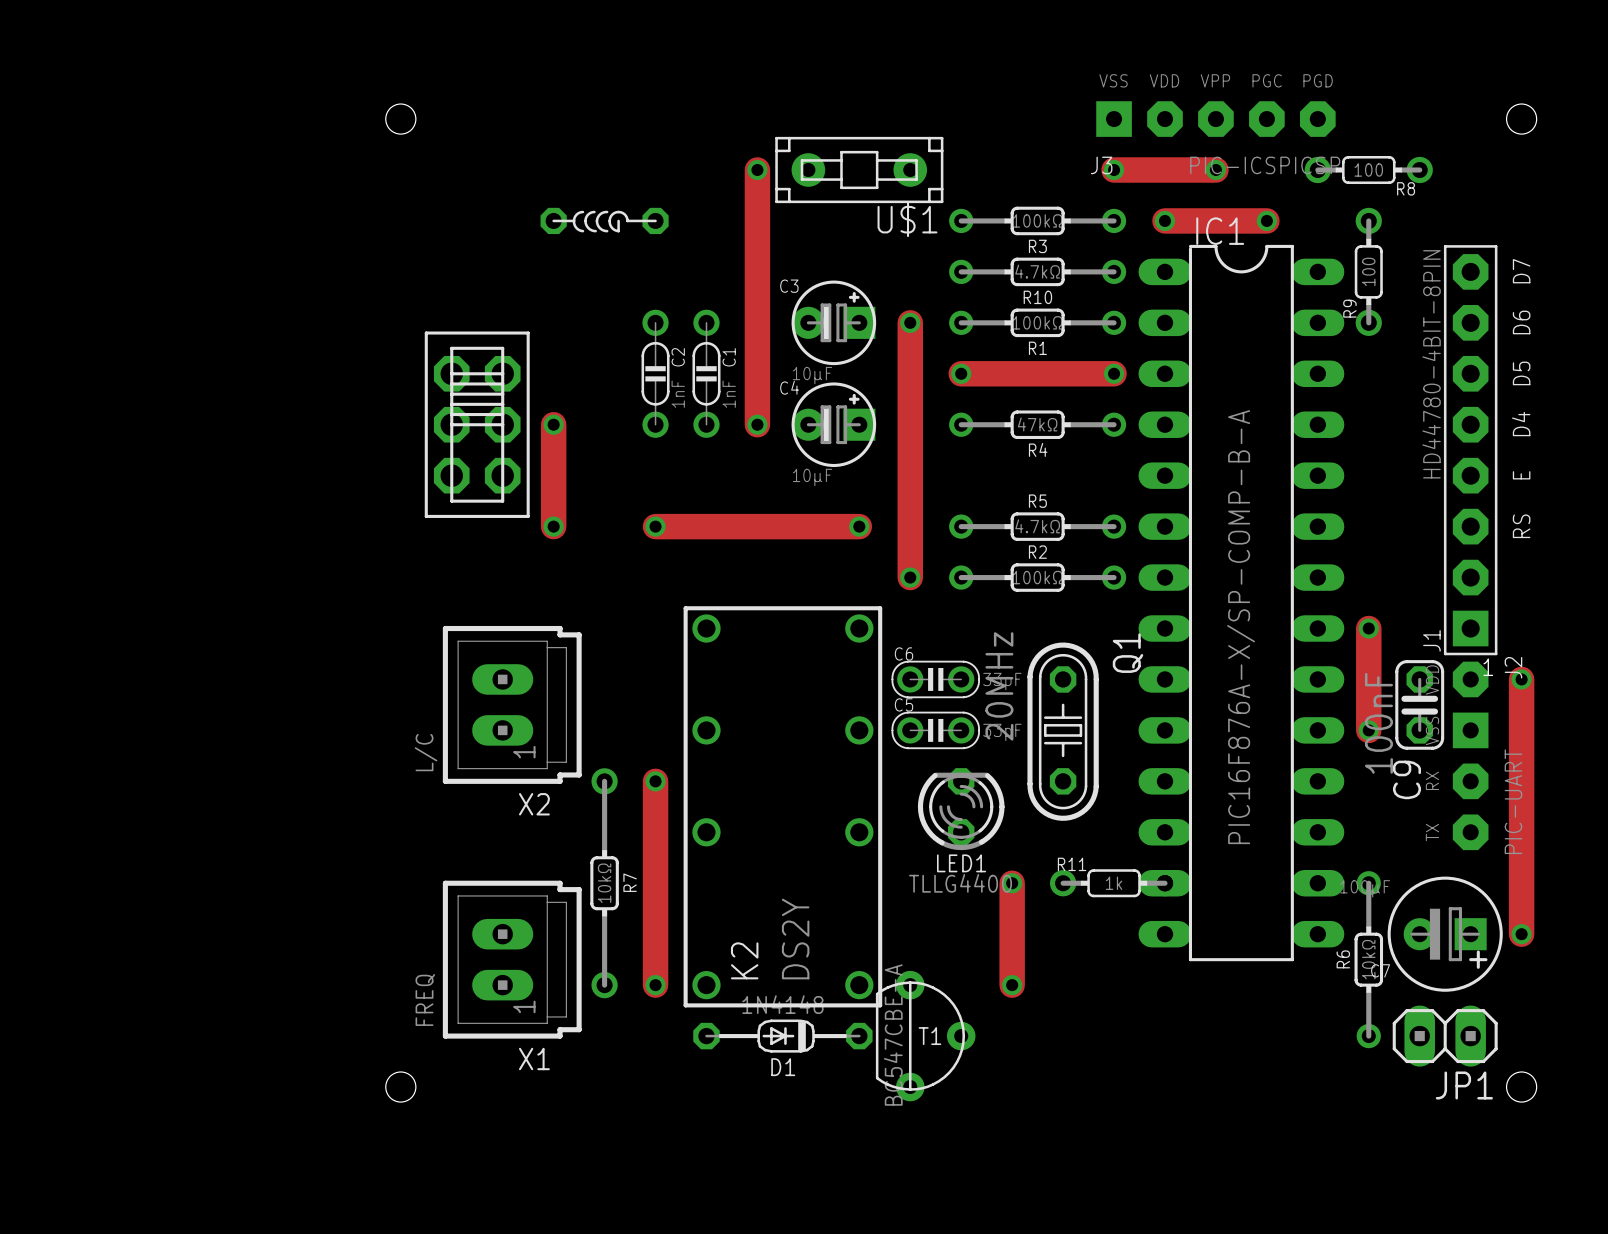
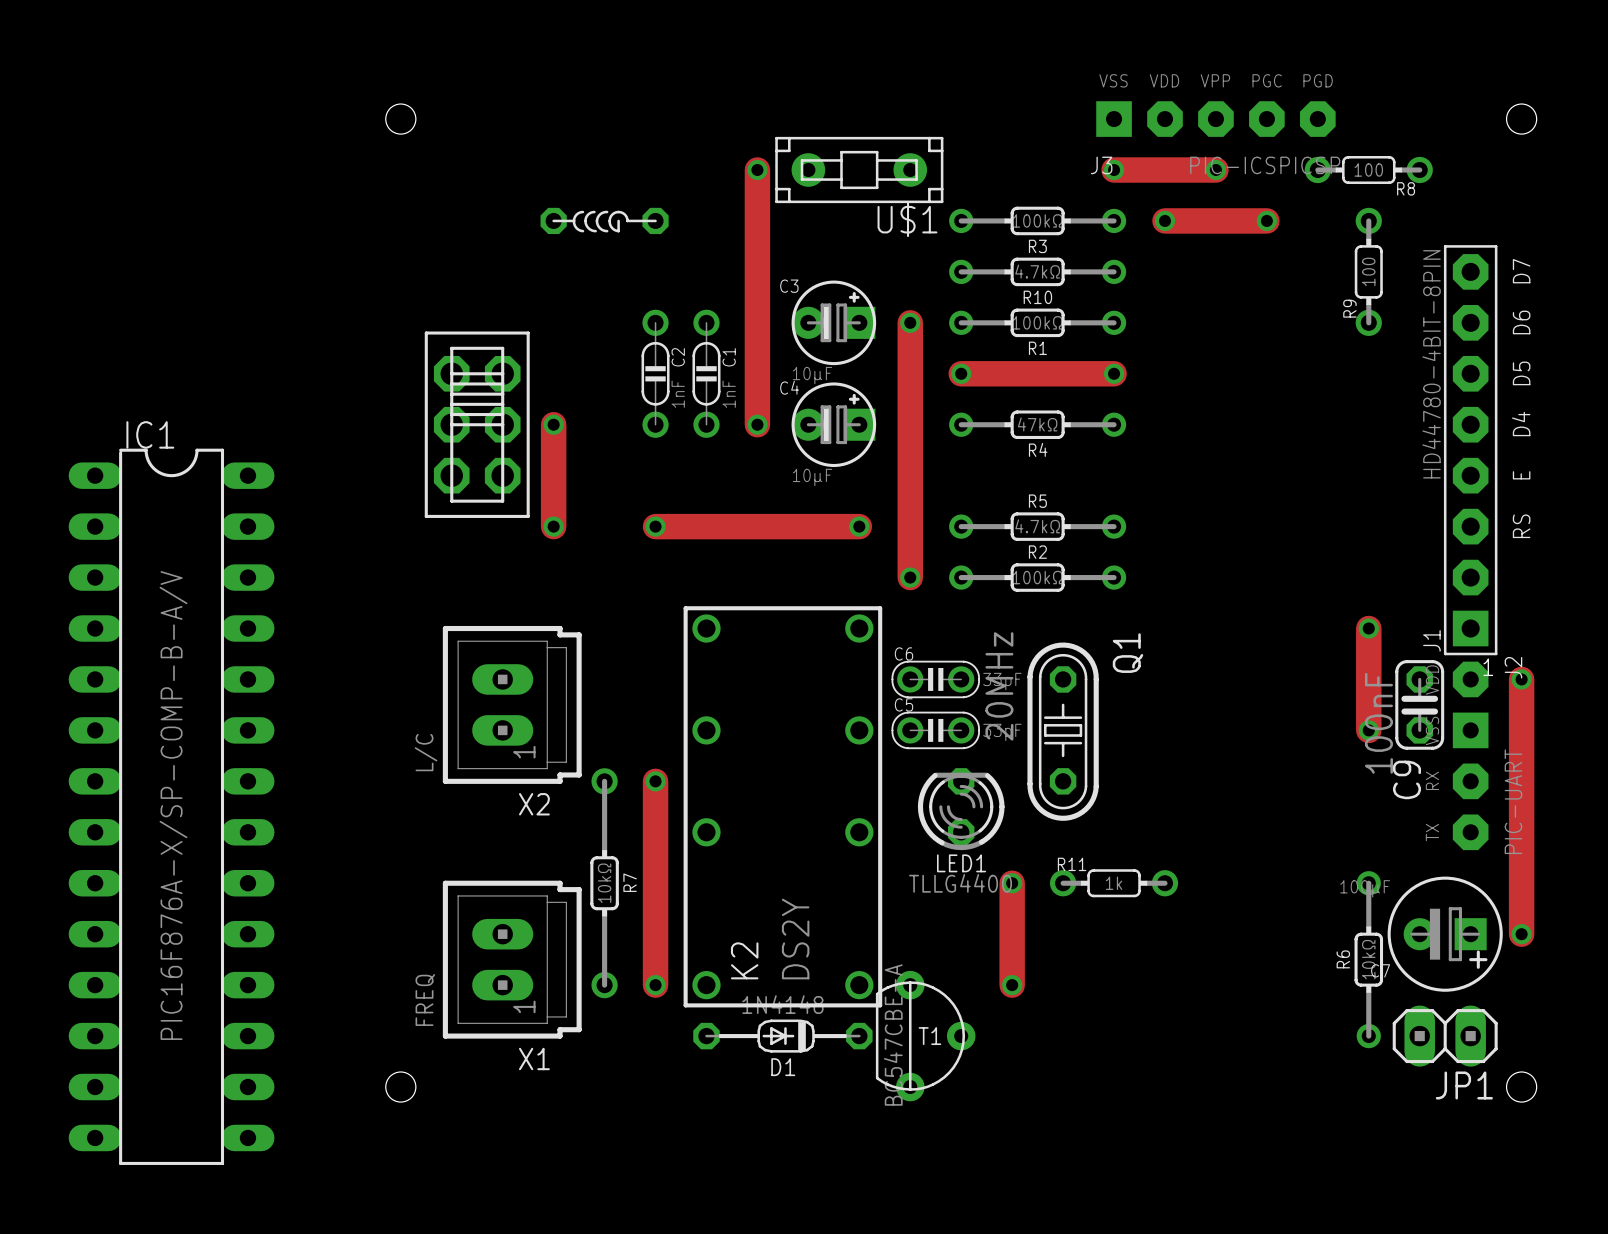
IC1 position: (1241, 603) -> (171, 806)
IC1 value: PIC16F876A-X/SP-COMP-B-A (1241, 627) -> PIC16F876A-X/SP-COMP-B-A/V (173, 805)

